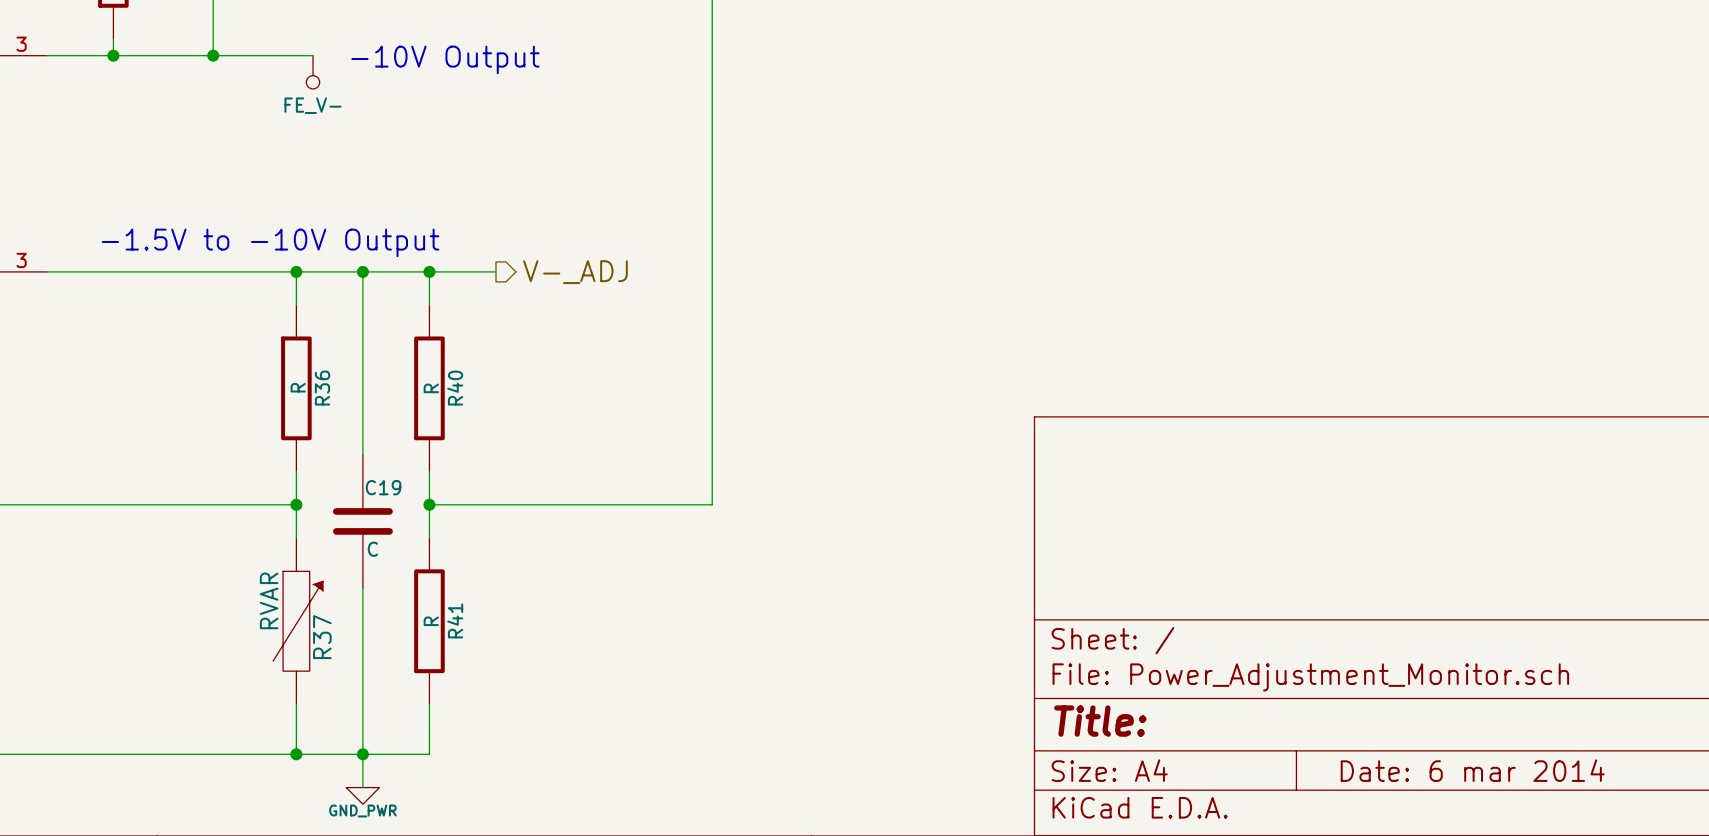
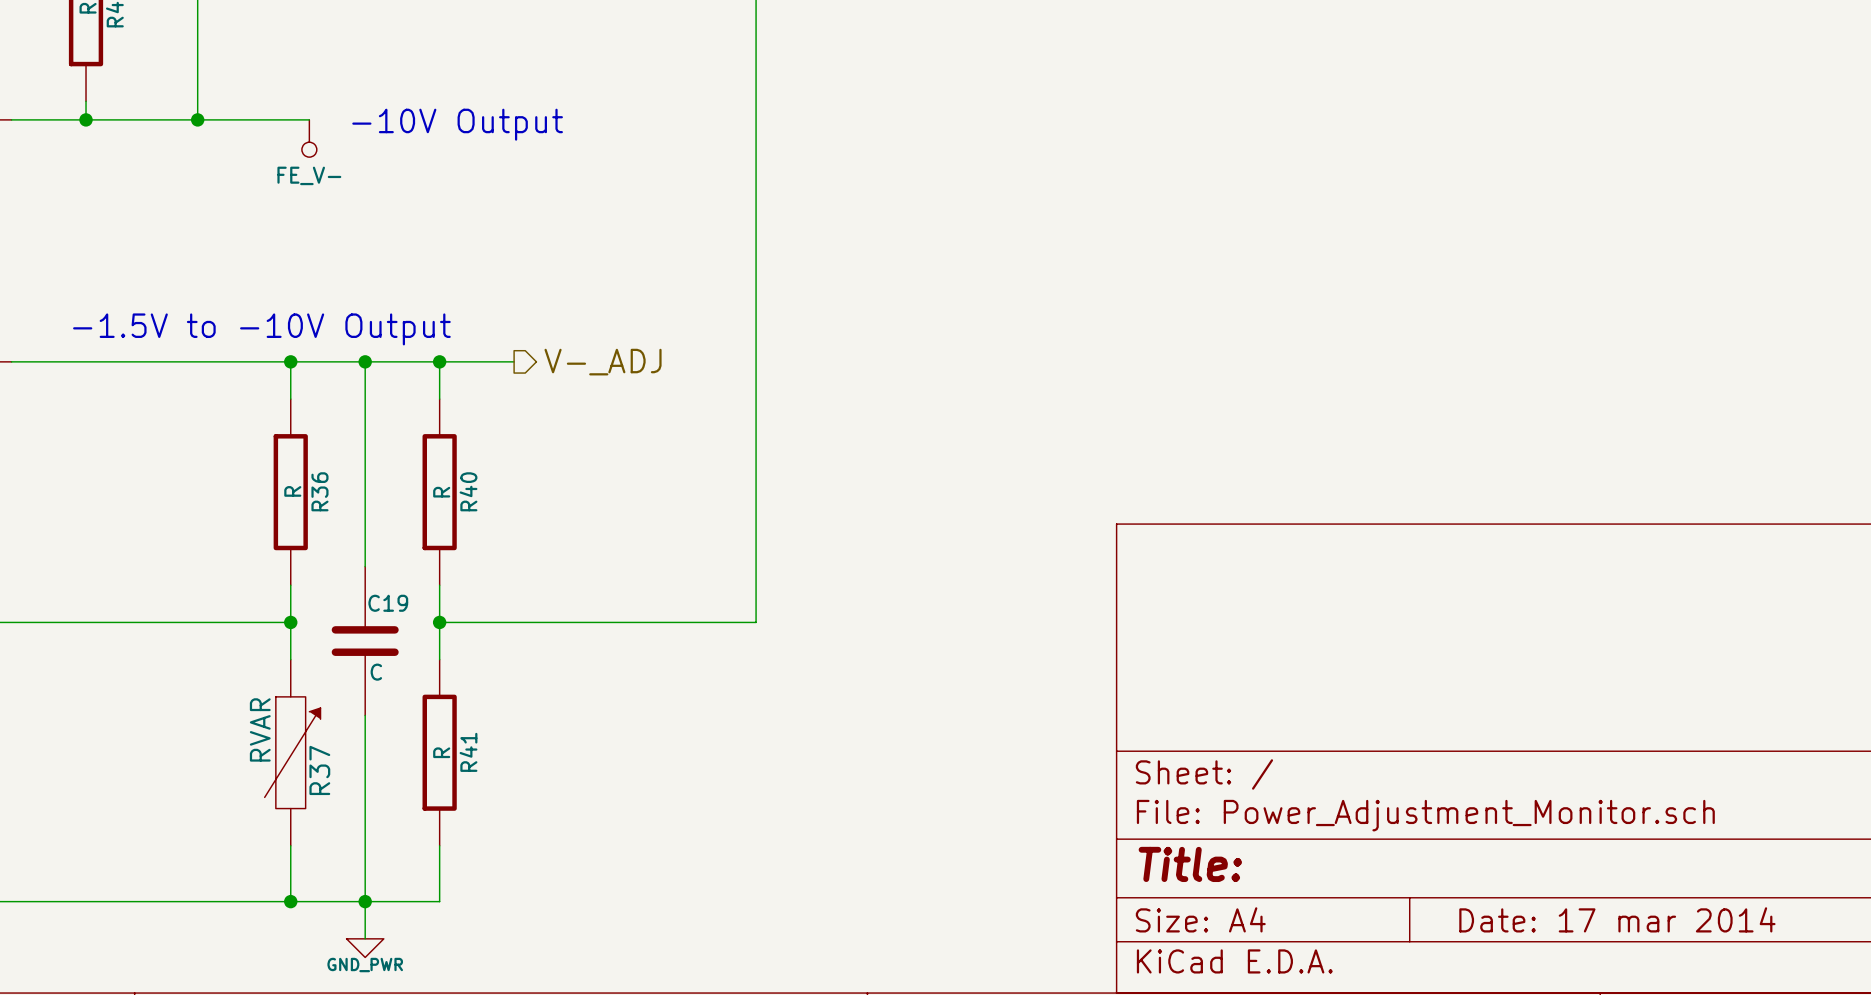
title block: Date: 6 mar 2014 (1472, 770) -> Date: 17 mar 2014 (1617, 919)

